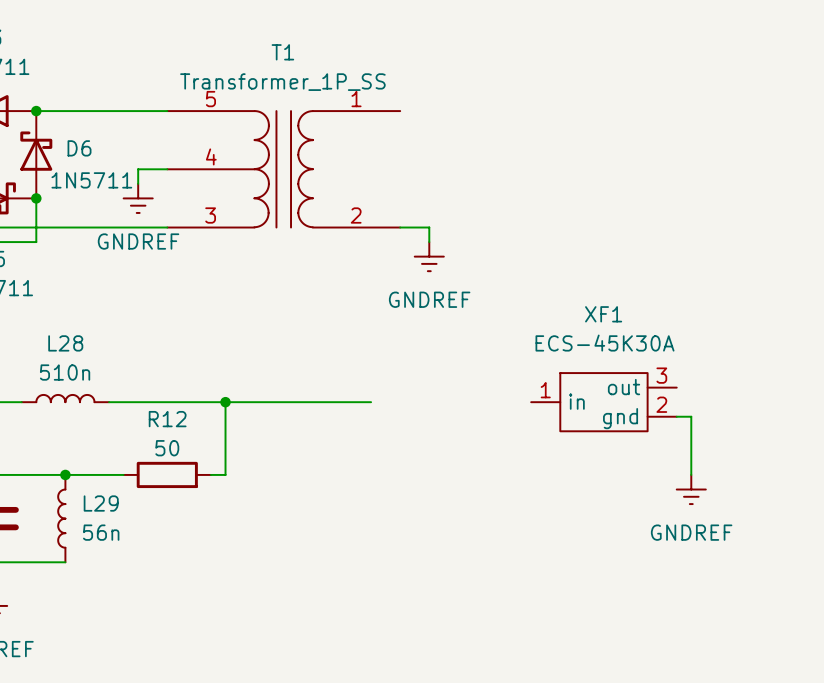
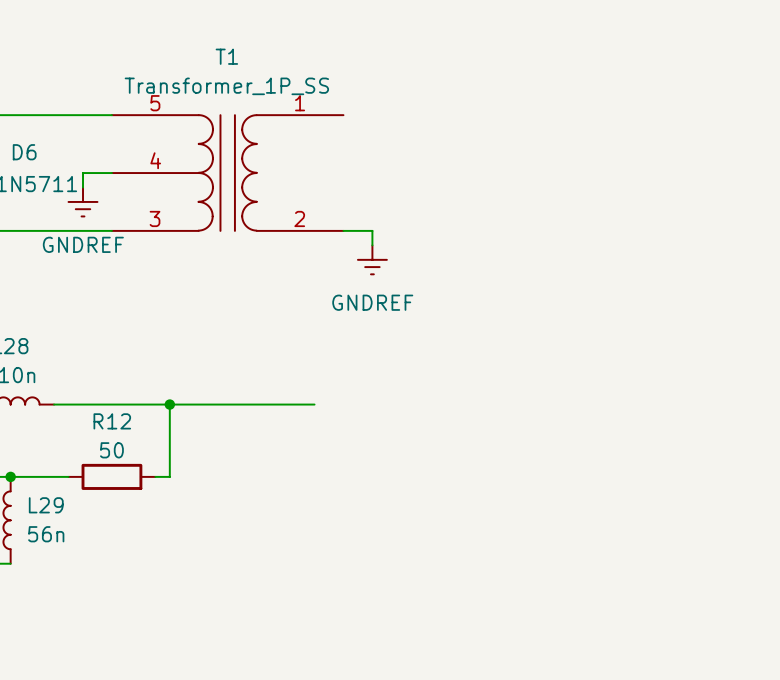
XF1: ECS-45K30A (603, 402) -> none
wire: (676, 416) (691, 416) (691, 474) -> none
power symbol: GNDREF (691, 489) -> none

